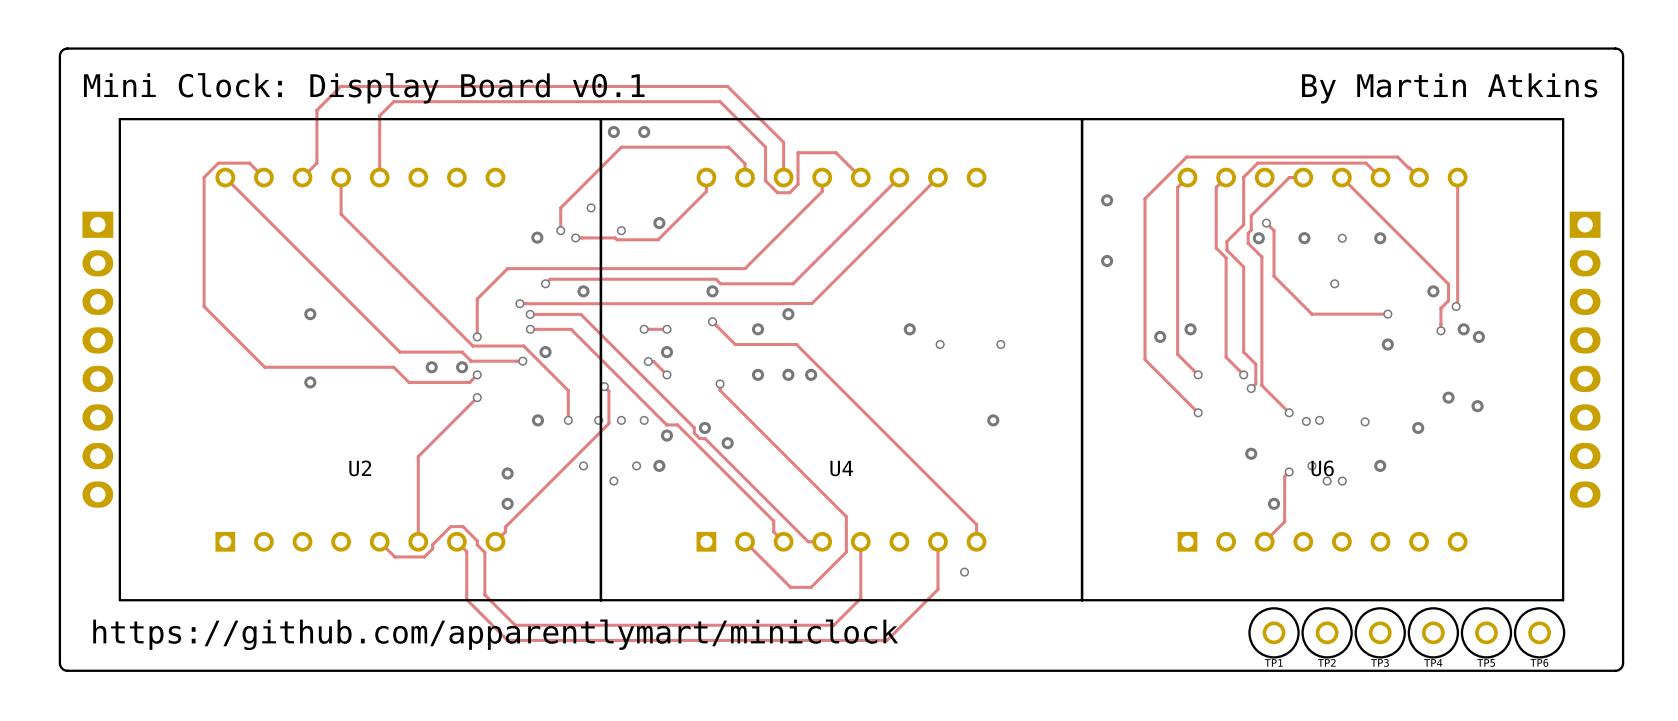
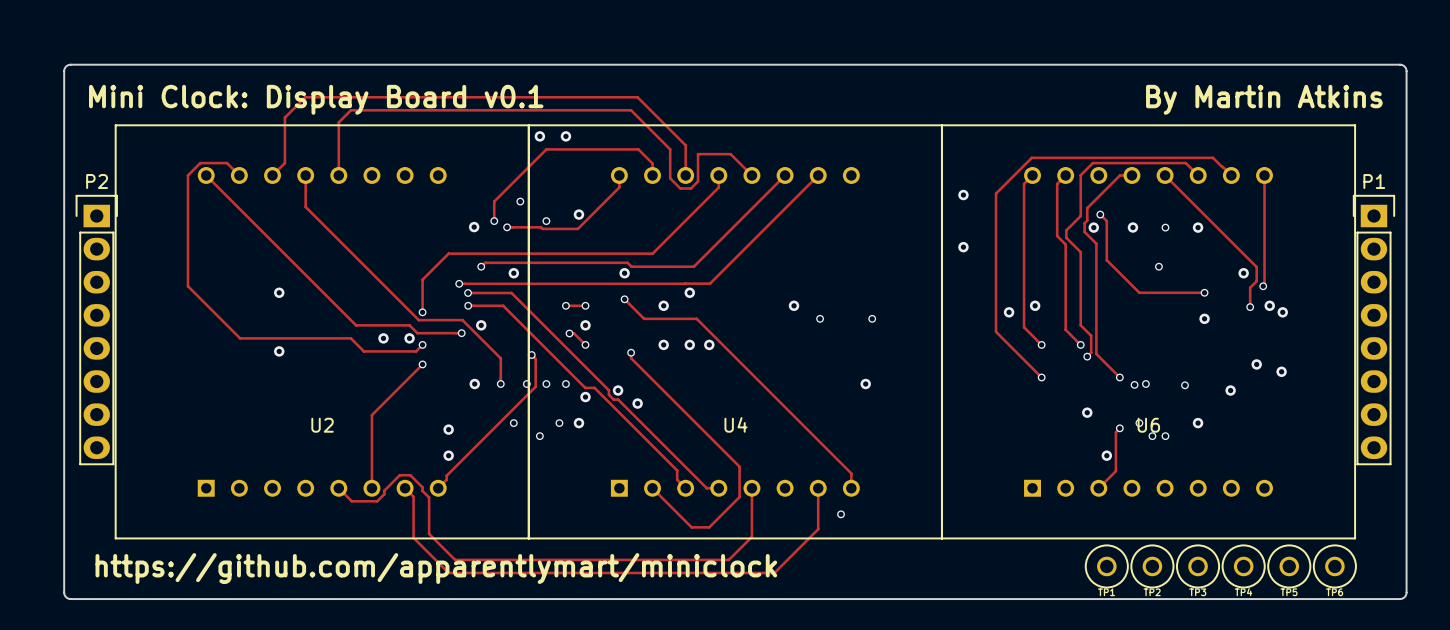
P2 side: bottom (97, 359) -> top (96, 330)
P1 side: bottom (1585, 359) -> top (1373, 330)

